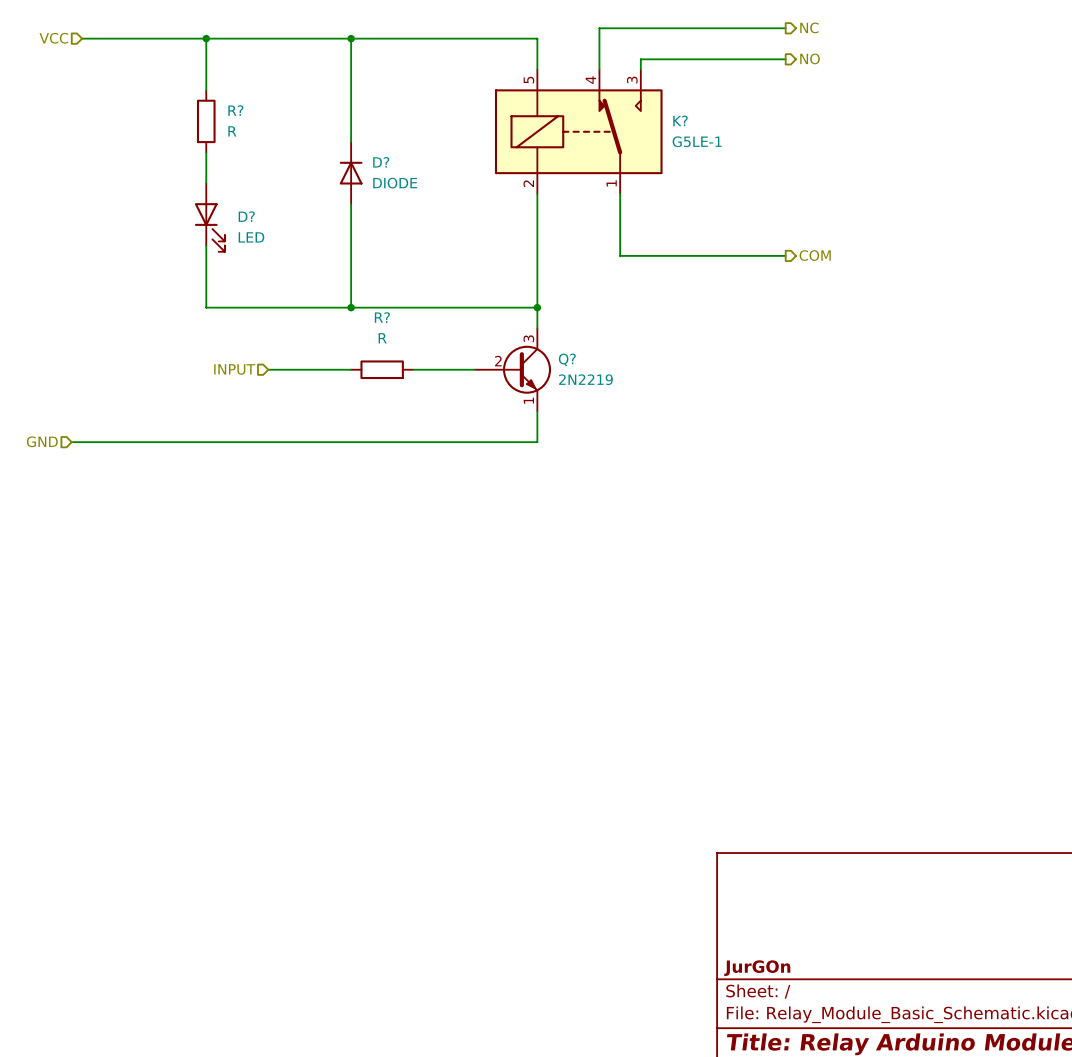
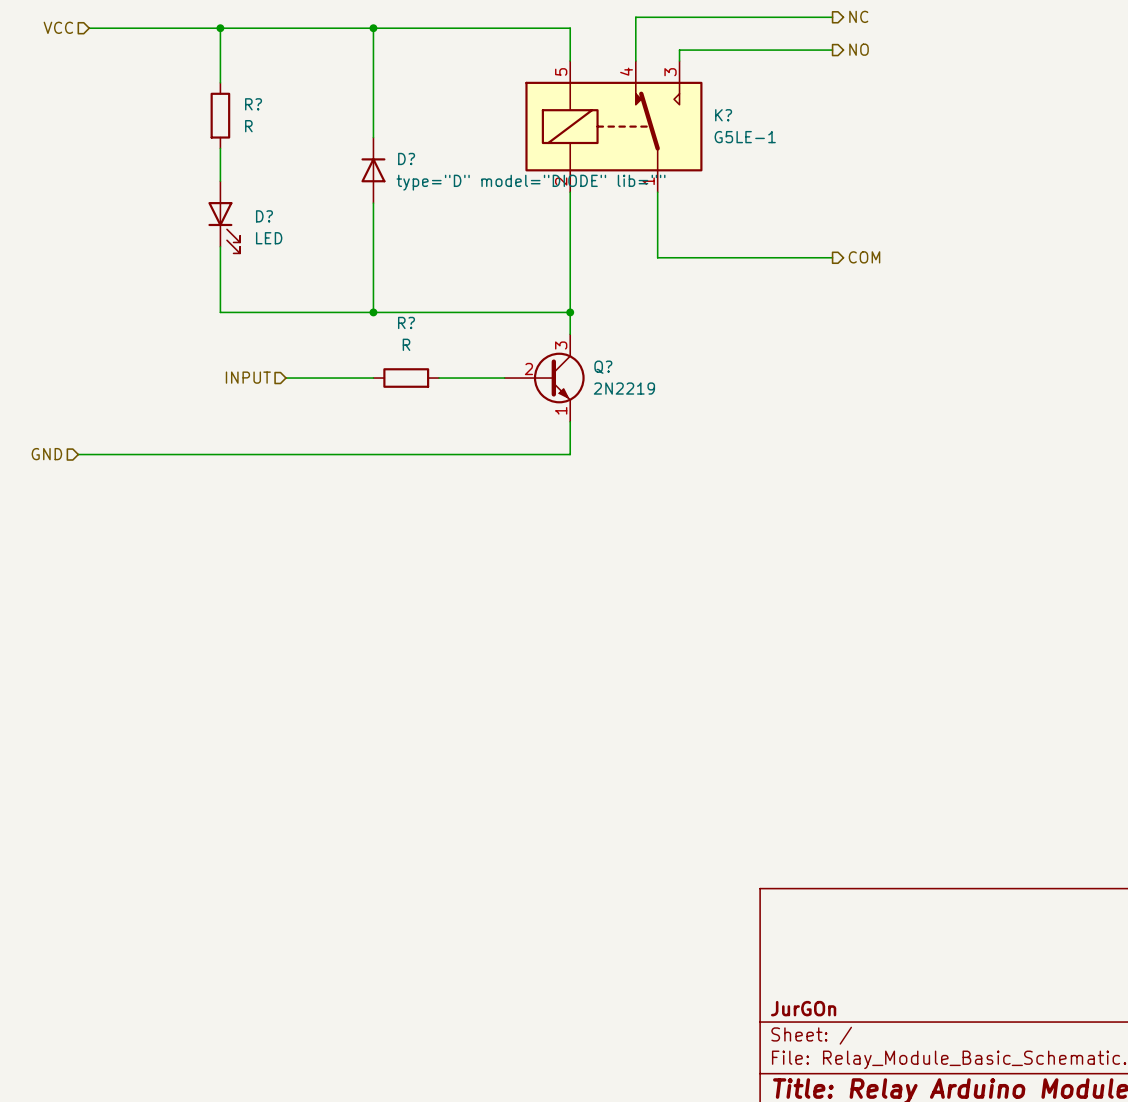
D? value: DIODE (395, 183) -> type="D" model="DIODE" lib="" (531, 182)

